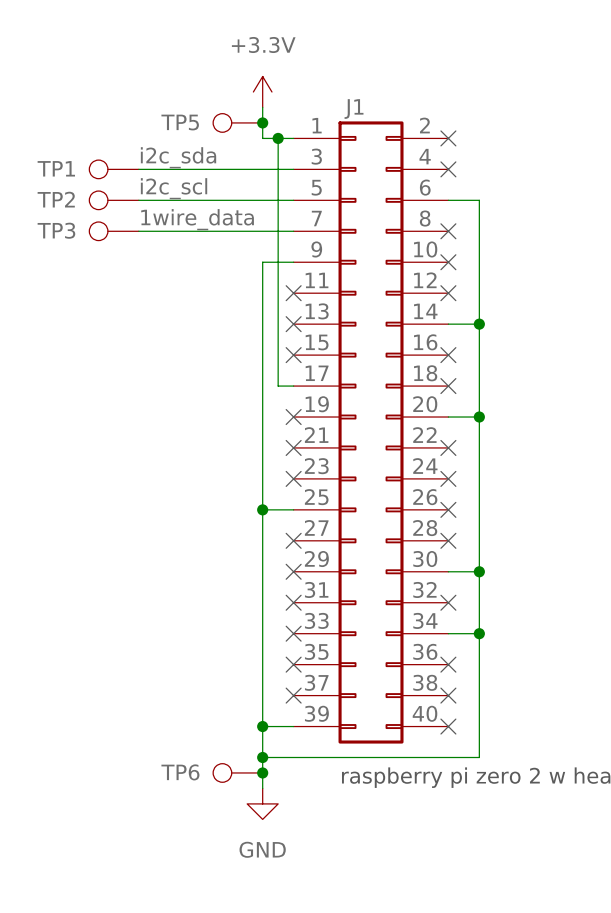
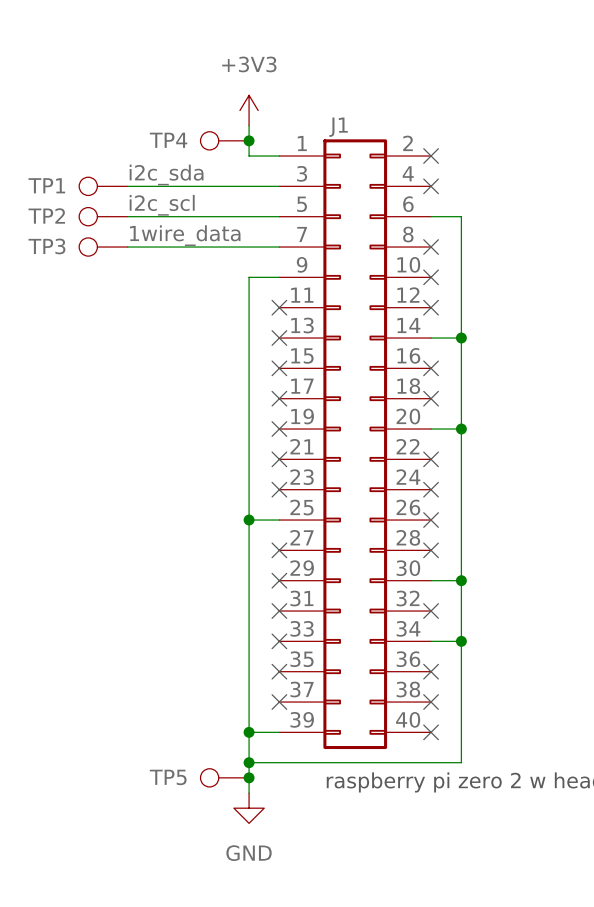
power symbol: +3.3V (262, 92) -> +3V3 (249, 110)
TP5 name: TP5 (180, 122) -> TP4 (168, 140)
wire: (278, 138) (278, 386) (293, 386) -> none
junction: (278, 138) -> none
no-connect mark: none -> (279, 398)
TP6 name: TP6 (180, 772) -> TP5 (168, 777)

